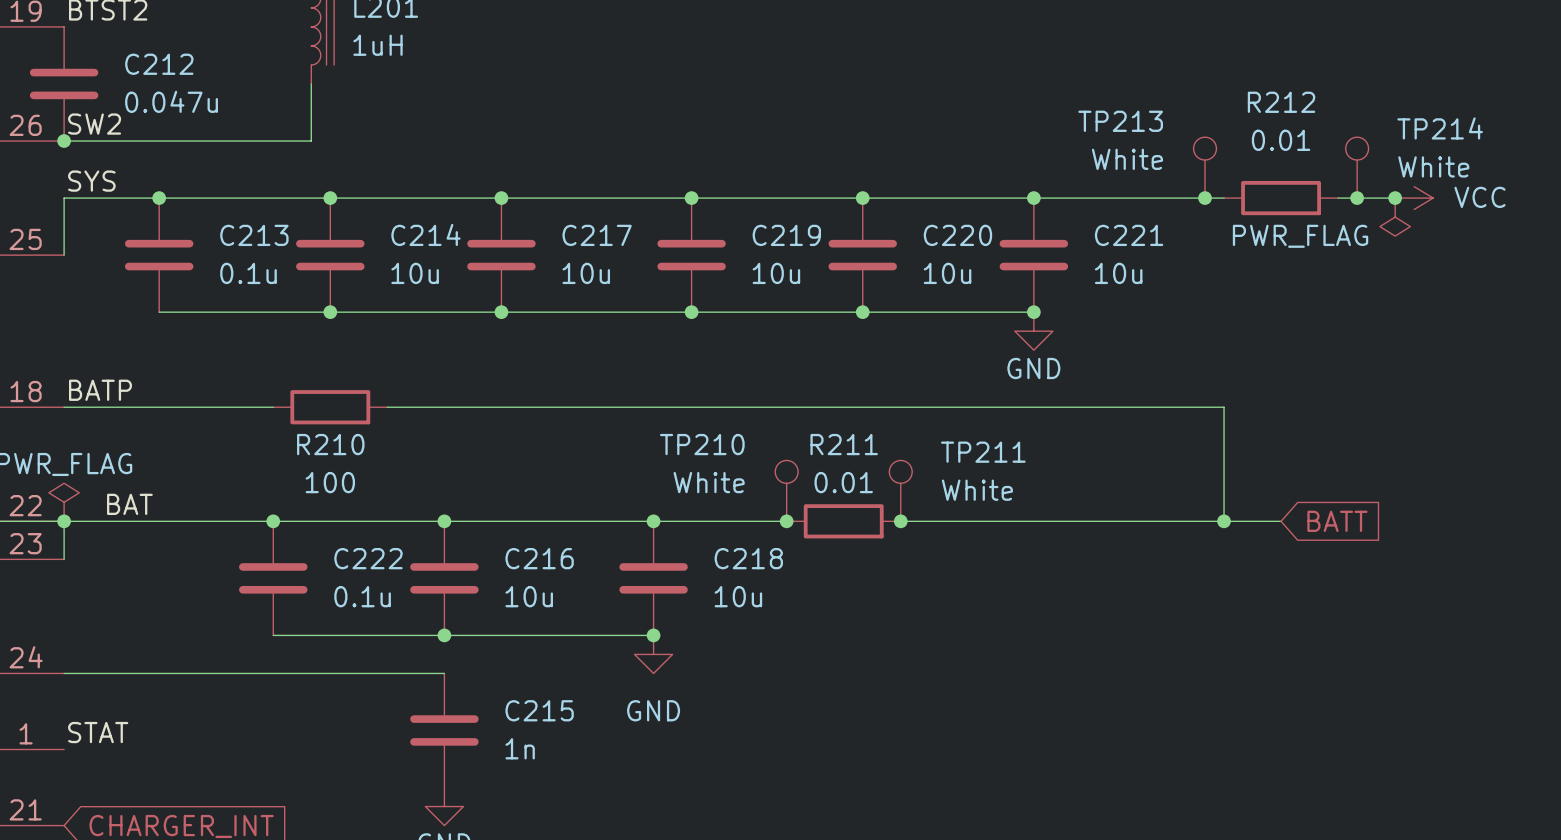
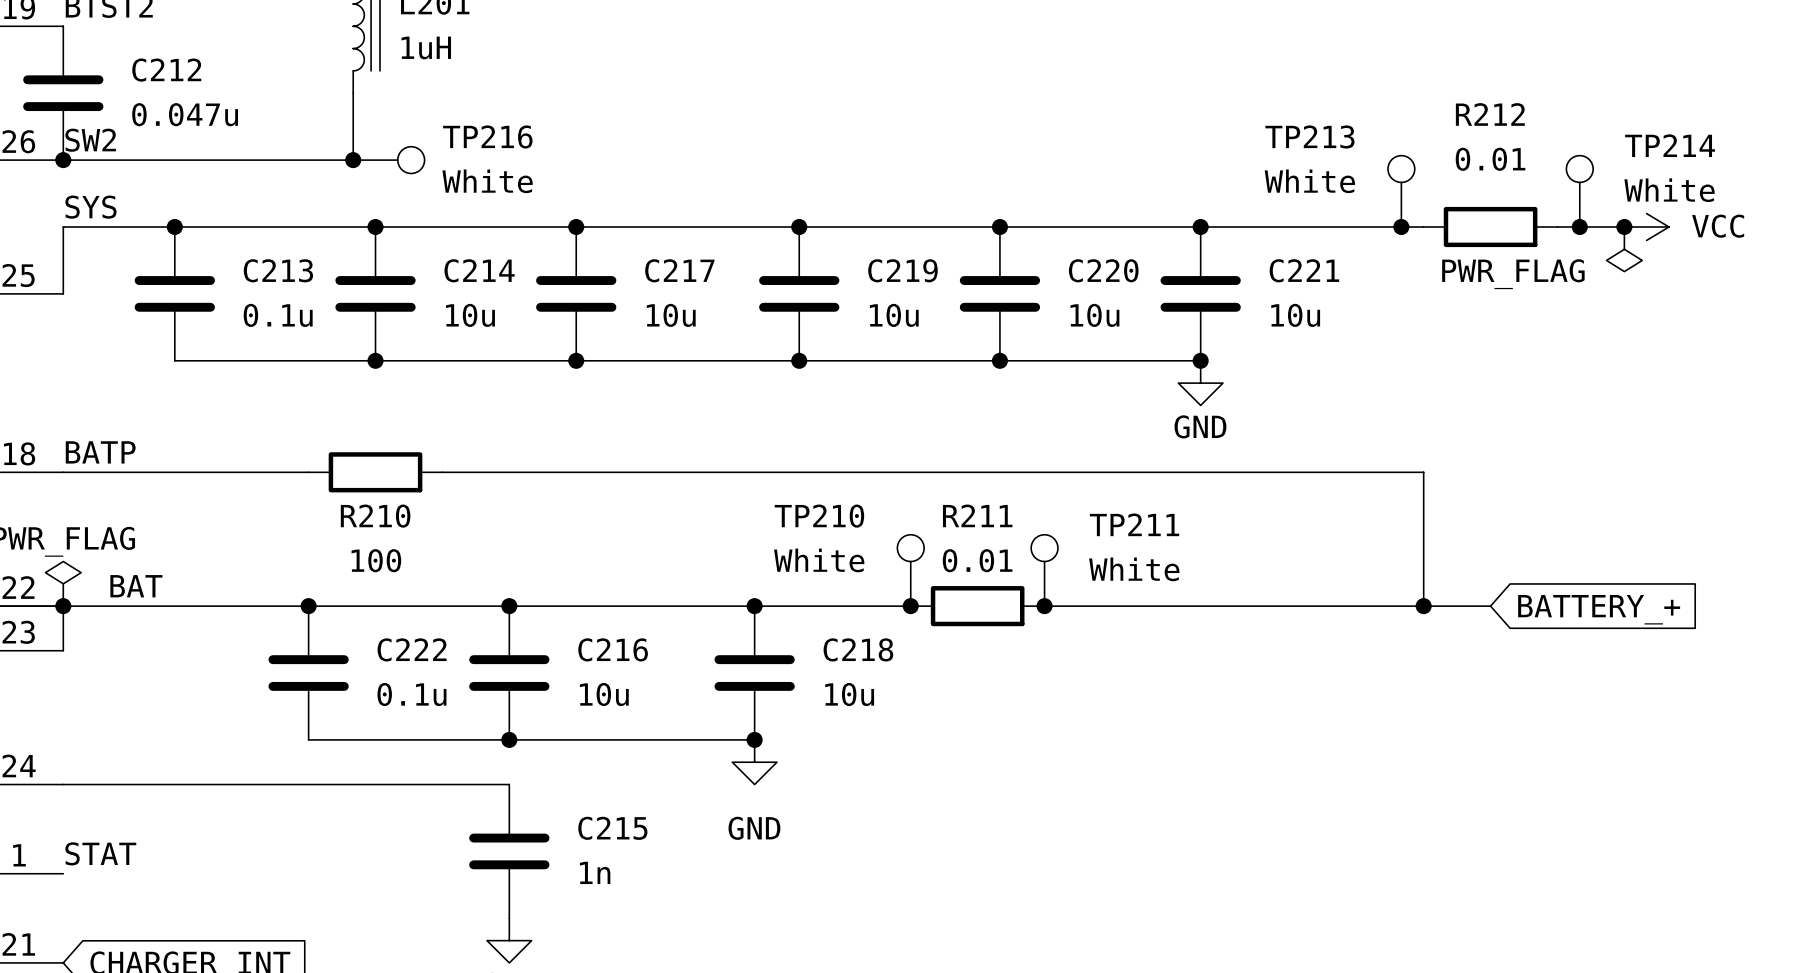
junction: none -> (353, 160)
TP216: none -> White (388, 160)
global label: BATT (1337, 521) -> BATTERY_+ (1599, 609)

